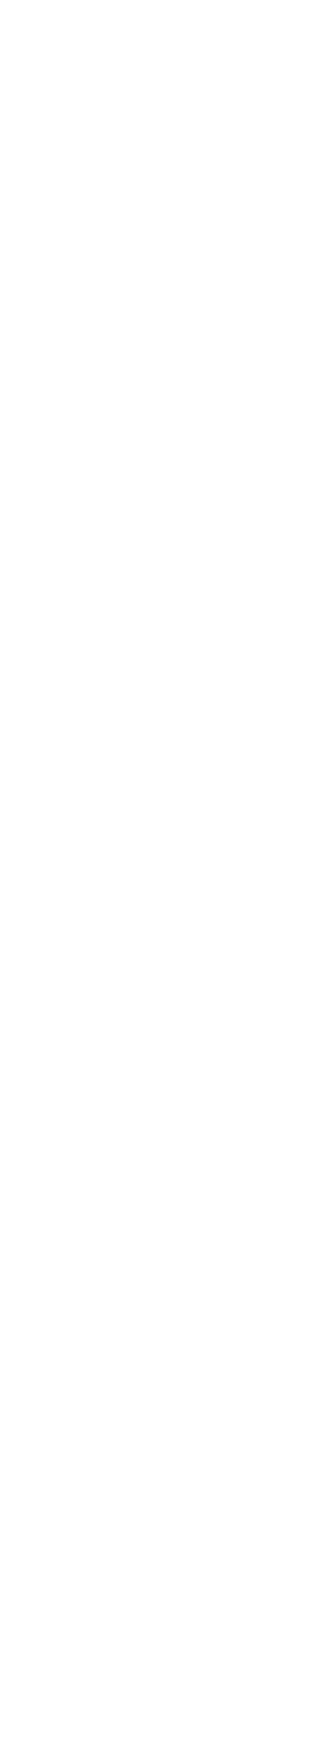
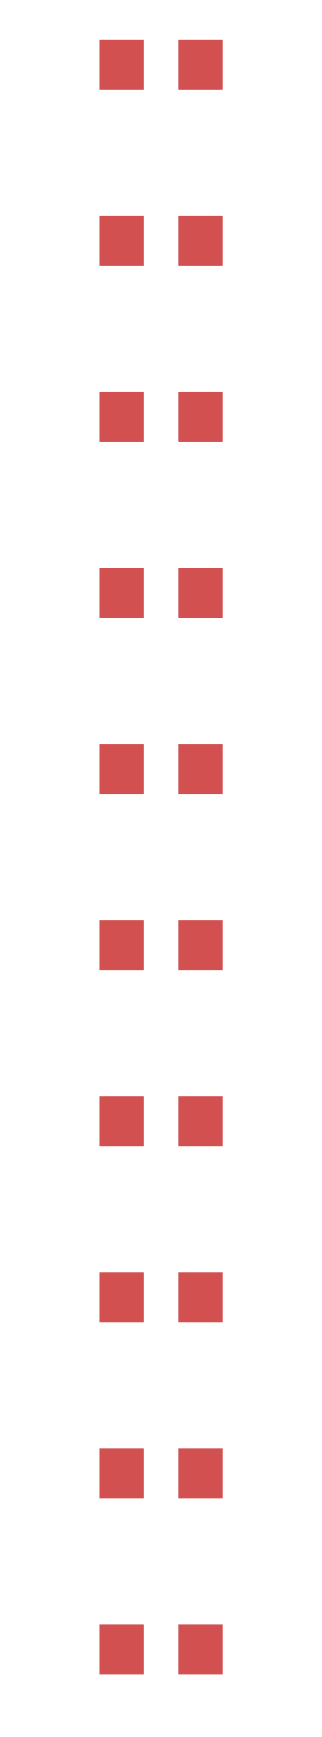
part: none -> (161, 64)
part: none -> (161, 240)
part: none -> (161, 416)
part: none -> (161, 593)
part: none -> (161, 769)
part: none -> (161, 945)
part: none -> (161, 1121)
part: none -> (161, 1297)
part: none -> (161, 1473)
part: none -> (161, 1649)

